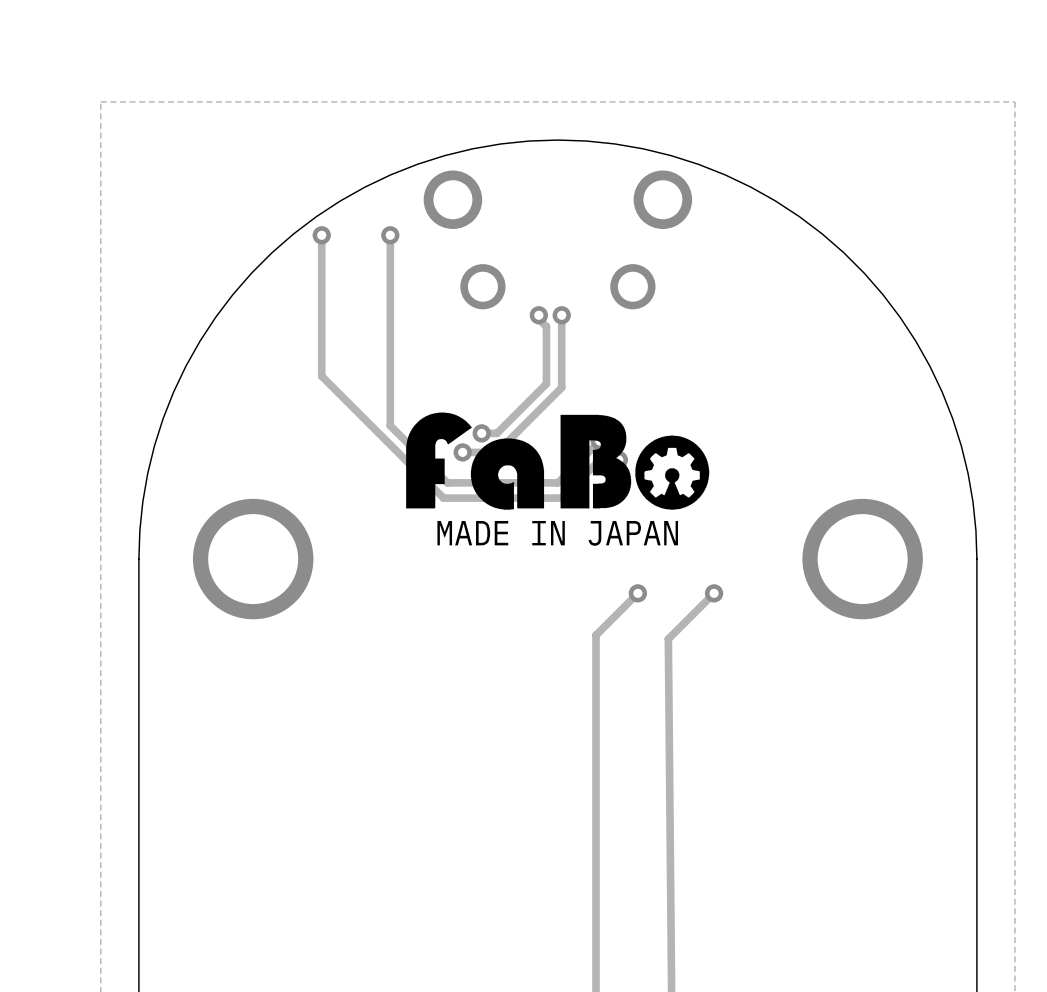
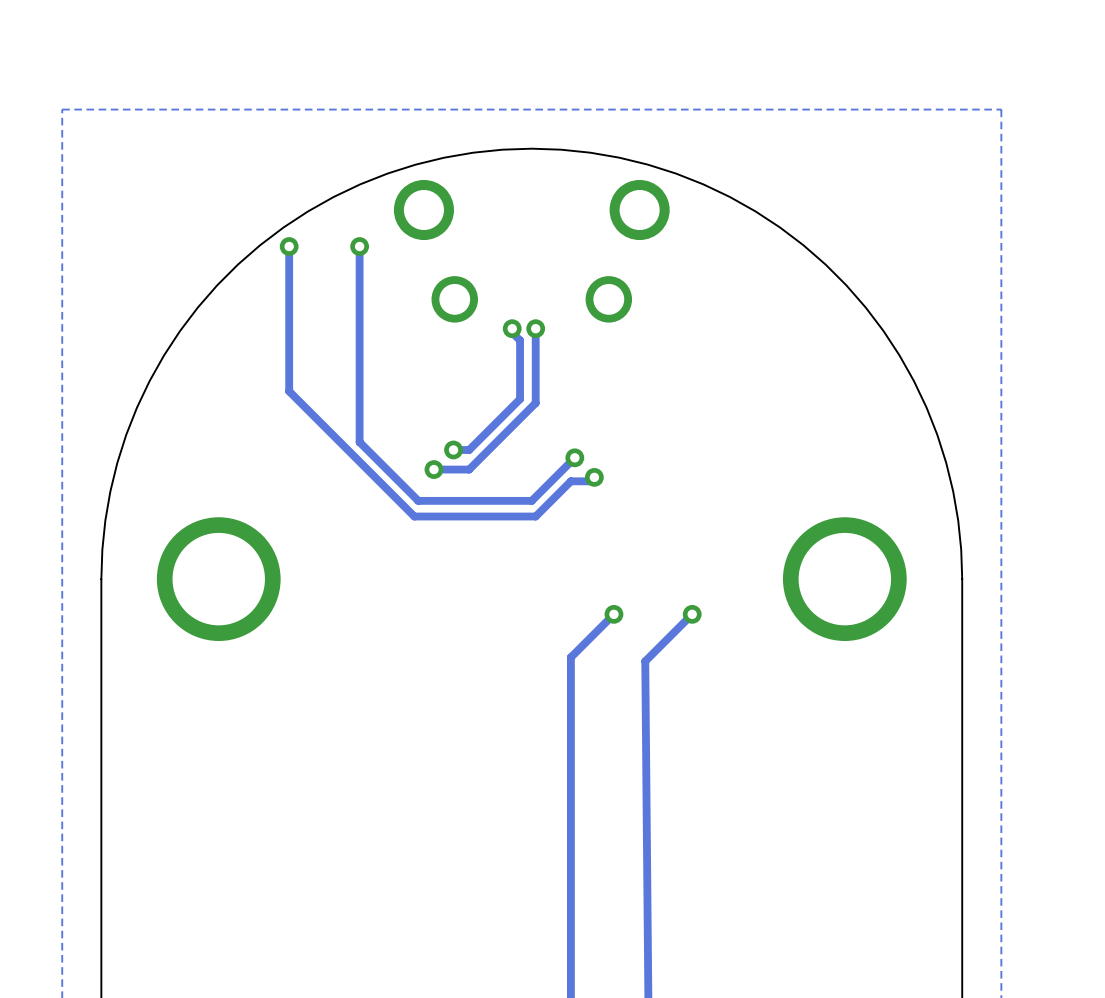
drawing: [406, 412, 710, 510] -> none
text: MADE IN JAPAN (557, 533) -> none

